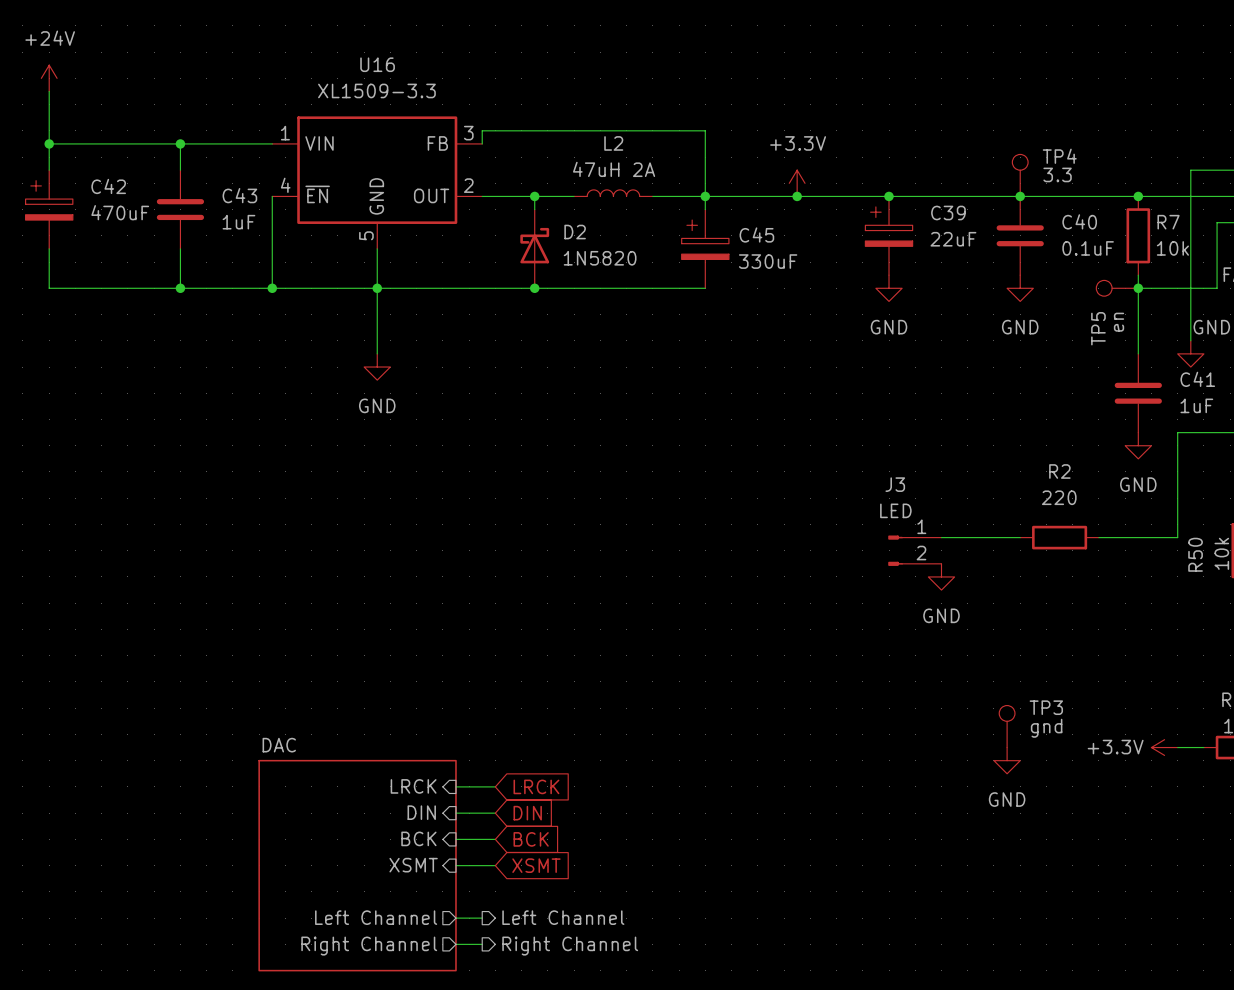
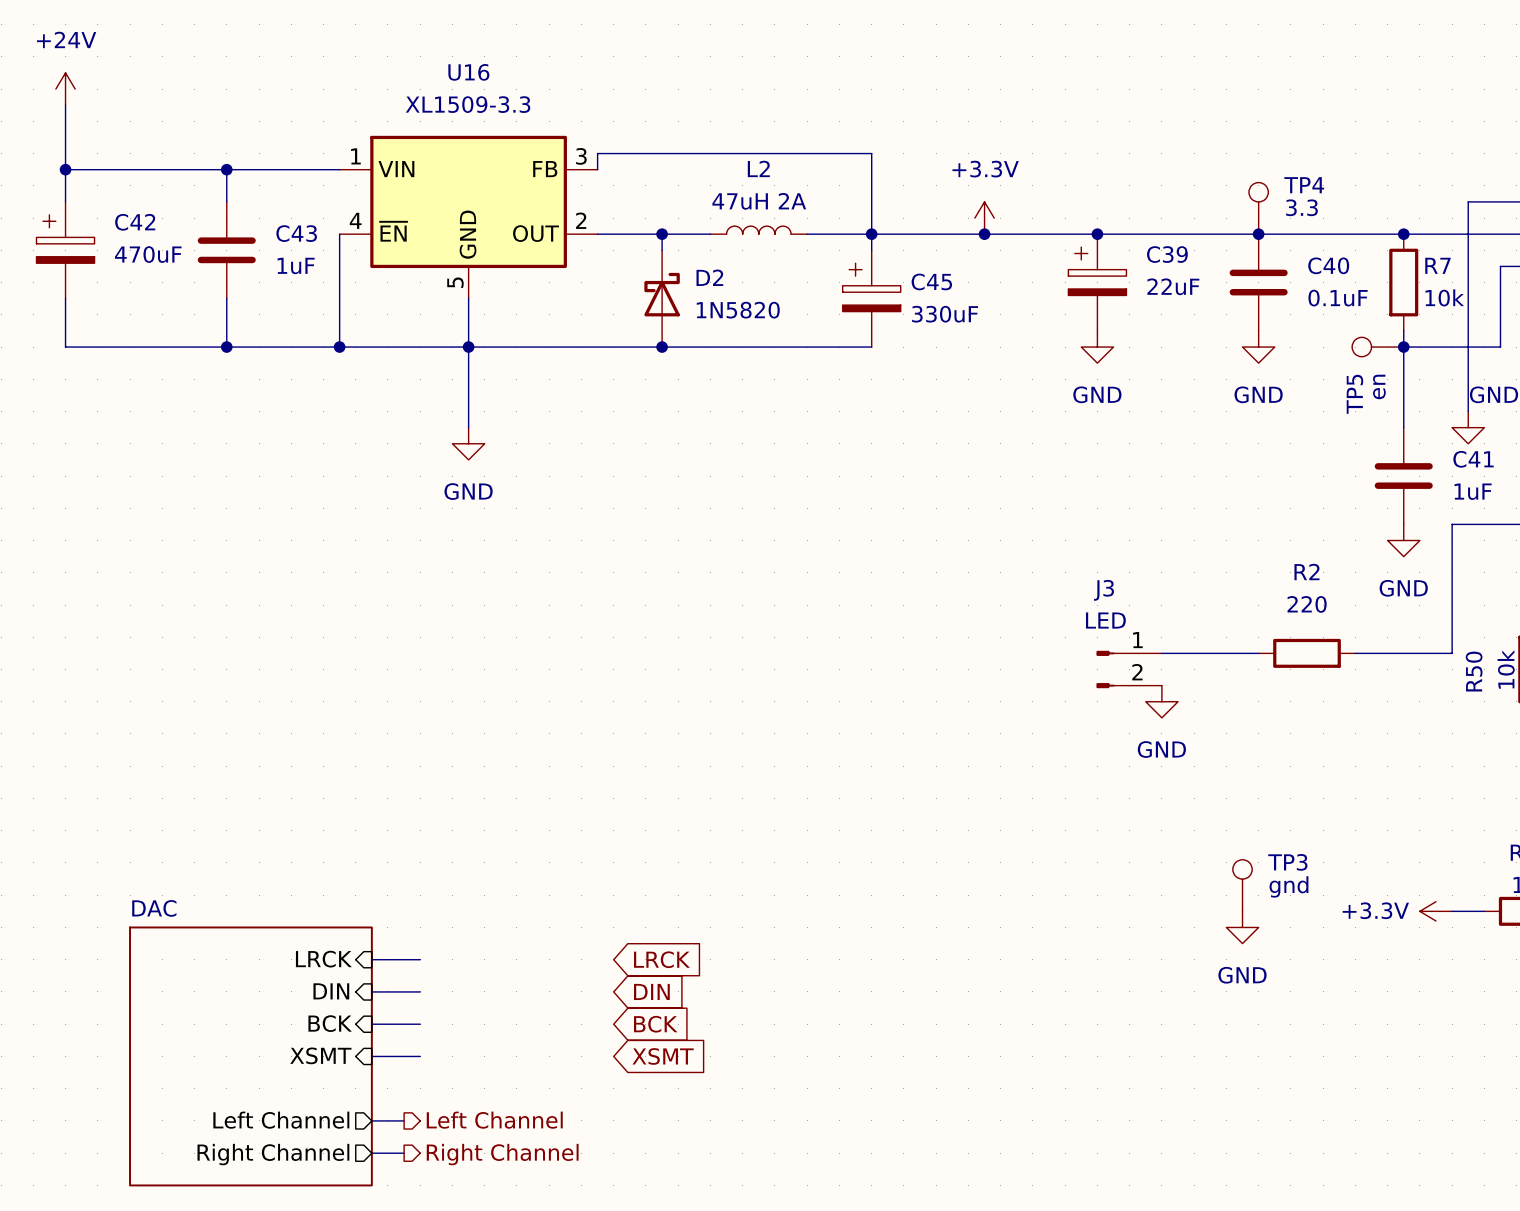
sheet pin position: LRCK (413, 786) -> LRCK (323, 959)
wire: (455, 786) (495, 786) -> (371, 959) (420, 959)
sheet pin position: DIN (421, 812) -> DIN (331, 991)
wire: (455, 813) (495, 813) -> (371, 991) (420, 991)
sheet pin position: BCK (418, 838) -> BCK (330, 1023)
wire: (455, 839) (495, 839) -> (371, 1024) (420, 1024)
sheet DAC position: (357, 865) -> (250, 1056)
sheet pin position: XSMT (413, 865) -> XSMT (320, 1055)
wire: (455, 865) (495, 865) -> (371, 1056) (420, 1056)
sheet pin position: Left Channel (376, 917) -> Left Channel (281, 1120)
hierarchical label position: Left Channel (563, 917) -> Left Channel (494, 1120)
wire: (455, 918) (482, 918) -> (371, 1120) (404, 1120)
wire: (455, 944) (482, 944) -> (371, 1153) (404, 1153)
sheet pin position: Right Channel (369, 946) -> Right Channel (273, 1154)
hierarchical label position: Right Channel (570, 946) -> Right Channel (502, 1154)

